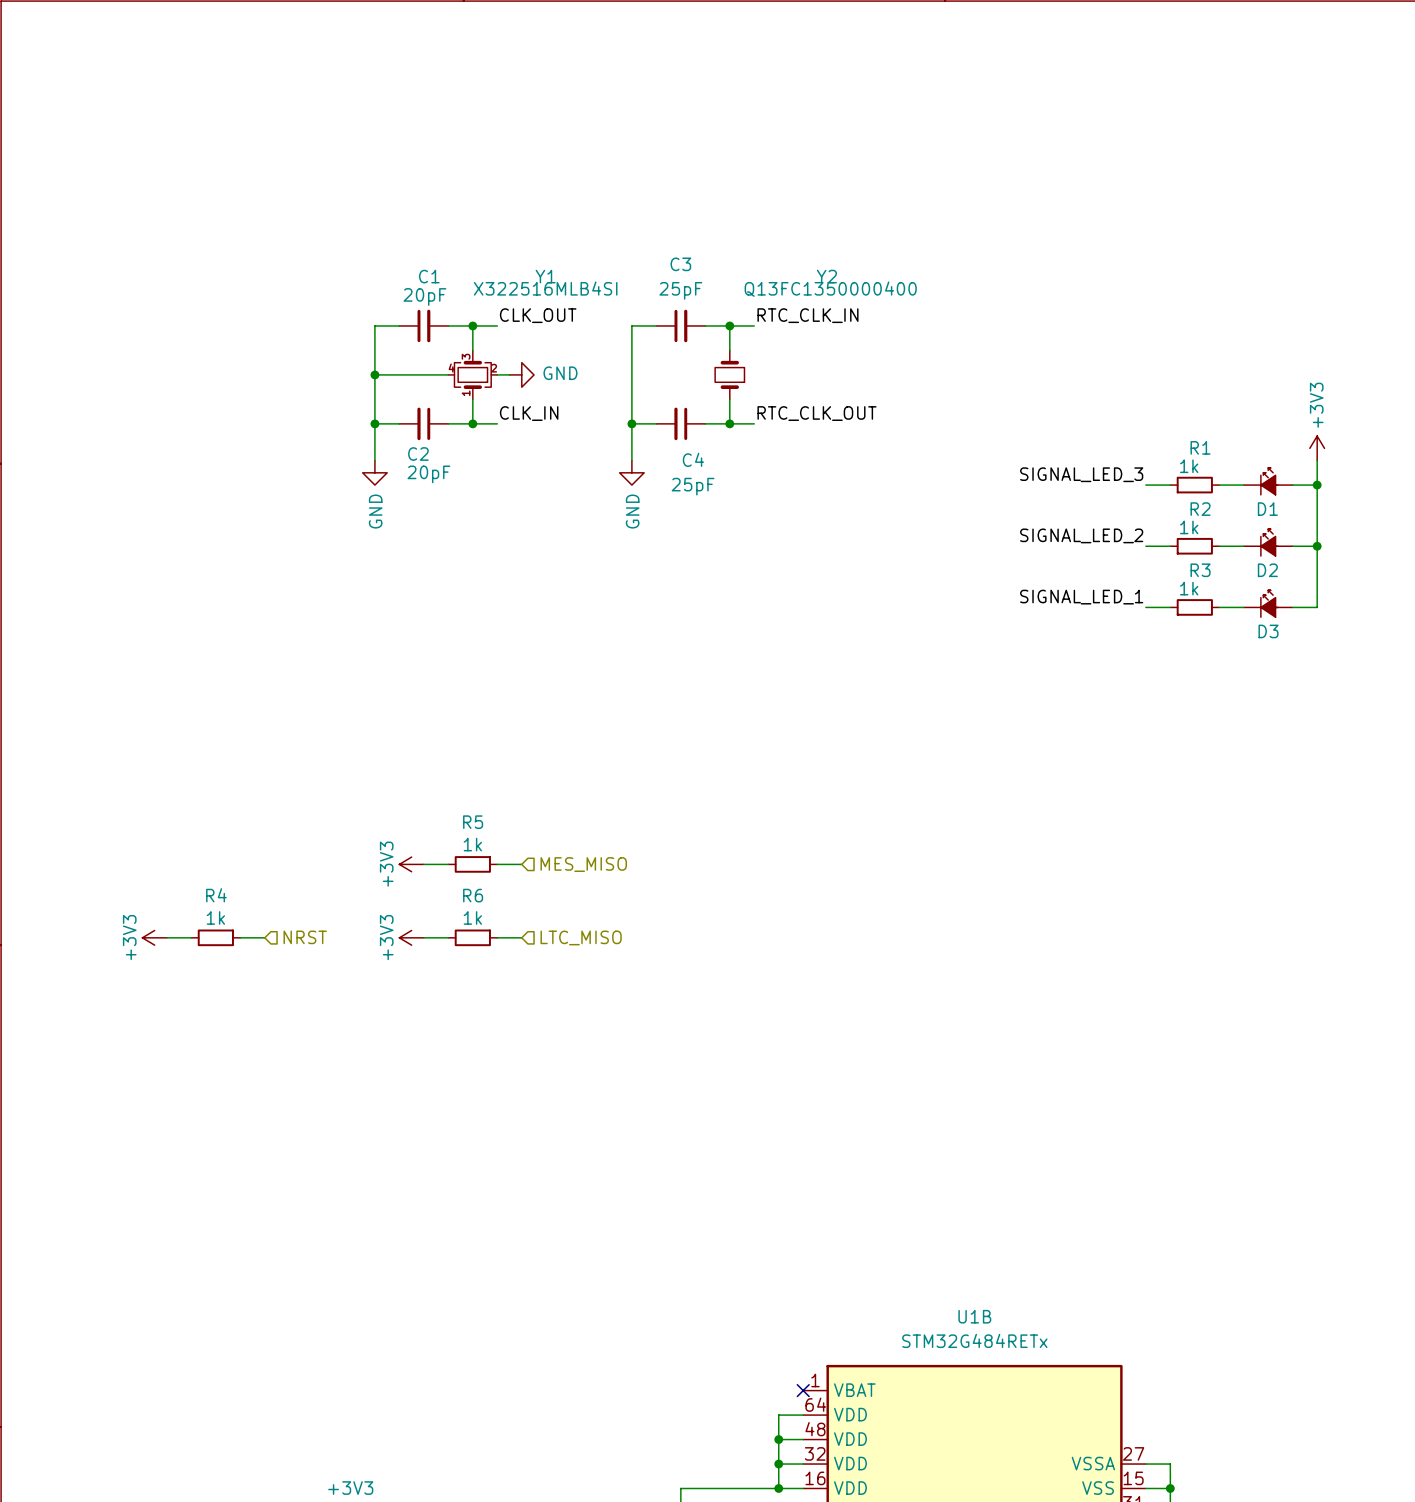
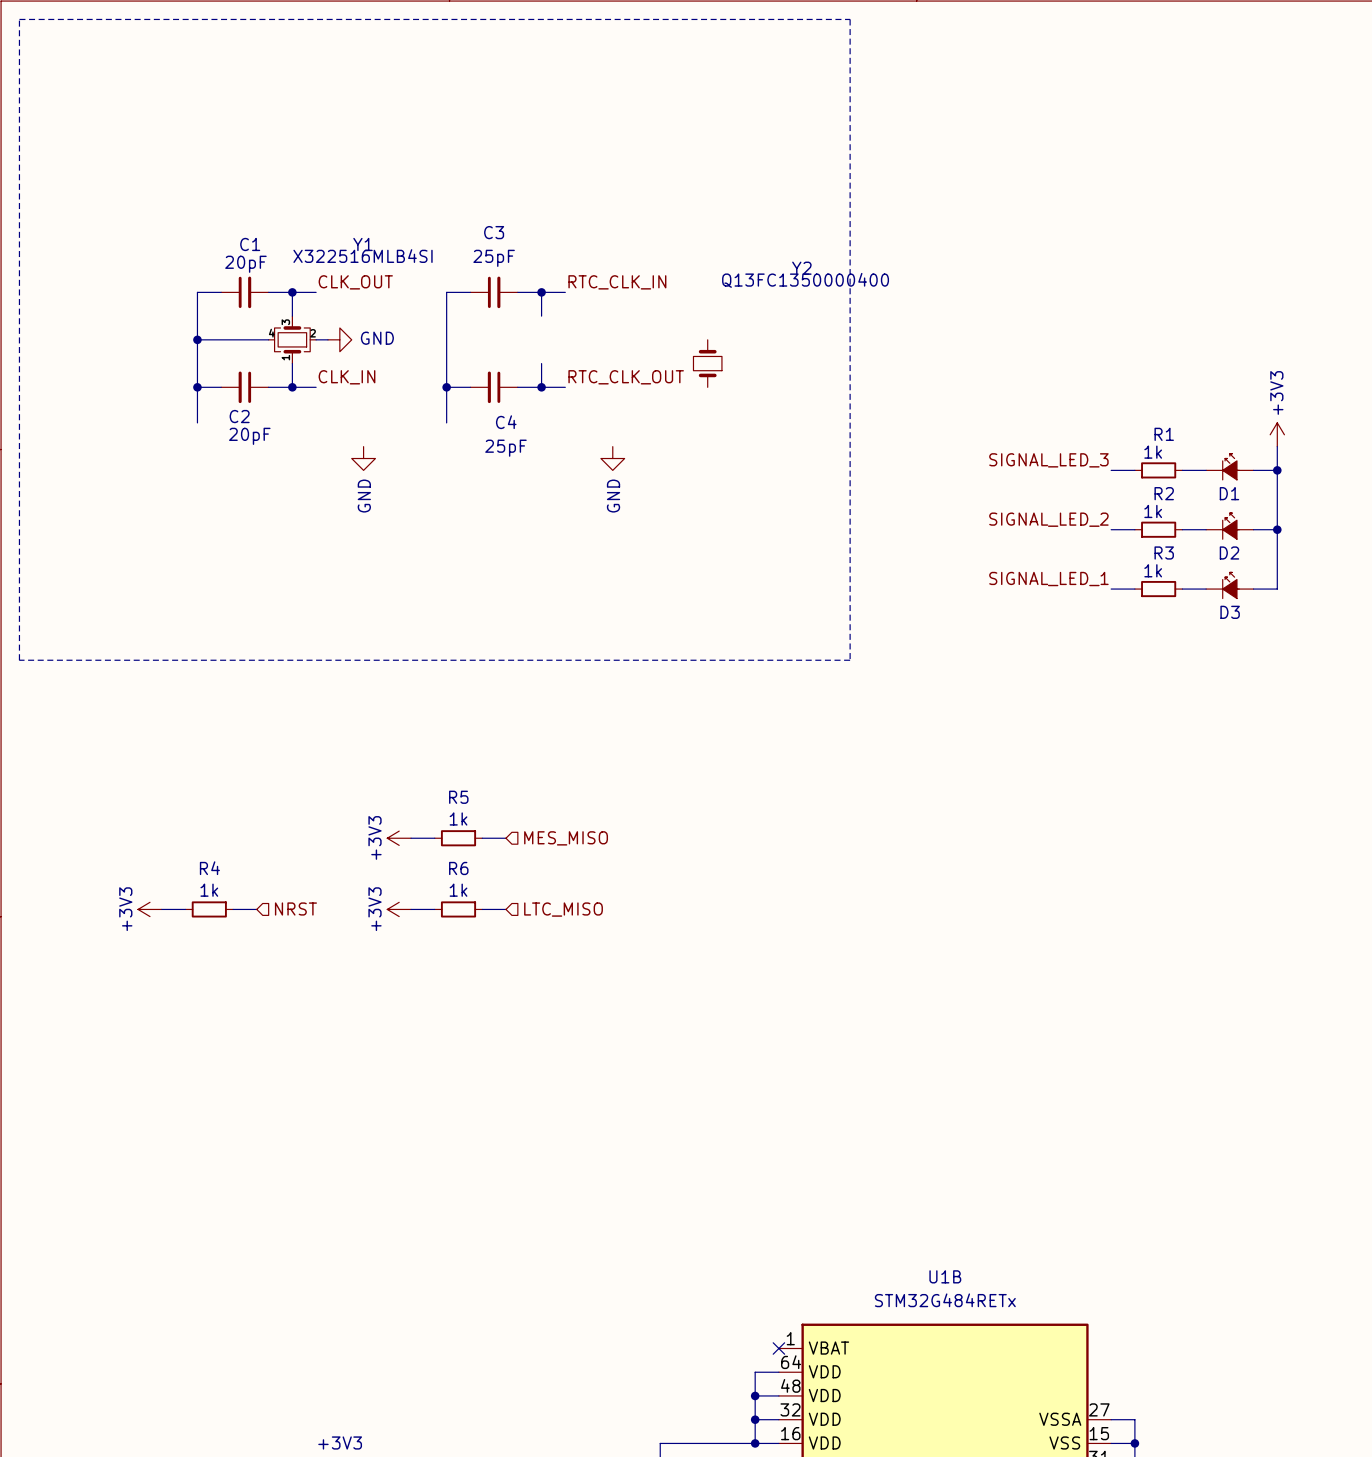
line: none -> (19, 19) (850, 19) (850, 660) (19, 660) (19, 19)
junction: none -> (292, 292)
junction: none -> (541, 292)
label position: CLK_OUT (538, 315) -> CLK_OUT (355, 282)
label position: RTC_CLK_IN (807, 315) -> RTC_CLK_IN (617, 282)
wire: (399, 325) (374, 325) (374, 460) -> (221, 292) (197, 292) (197, 422)
C1 position: (423, 325) -> (244, 292)
wire: (448, 325) (497, 325) -> (268, 292) (316, 292)
wire: (472, 325) (472, 350) -> (292, 292) (292, 316)
junction: (472, 325) -> none
wire: (656, 325) (631, 325) (631, 460) -> (470, 292) (446, 292) (446, 422)
C3 position: (680, 325) -> (494, 292)
wire: (705, 325) (754, 325) -> (517, 292) (565, 292)
wire: (729, 325) (729, 350) -> (541, 292) (541, 316)
junction: (729, 325) -> none
junction: none -> (197, 339)
wire: (374, 374) (448, 374) -> (197, 339) (268, 339)
junction: (374, 374) -> none
Y1 position: (472, 374) -> (292, 339)
wire: (497, 374) (509, 374) -> (316, 339) (327, 339)
power symbol position: GND (521, 374) -> GND (339, 339)
junction: none -> (197, 387)
junction: none -> (292, 387)
wire: (472, 399) (472, 423) -> (292, 363) (292, 387)
junction: none -> (541, 387)
wire: (729, 399) (729, 423) -> (541, 363) (541, 387)
label position: CLK_IN (529, 413) -> CLK_IN (347, 377)
label position: RTC_CLK_OUT (817, 413) -> RTC_CLK_OUT (626, 377)
wire: (374, 423) (399, 423) -> (197, 387) (221, 387)
junction: (374, 423) -> none
C2 position: (423, 423) -> (244, 387)
wire: (448, 423) (497, 423) -> (268, 387) (316, 387)
junction position: (472, 423) -> (446, 387)
wire: (631, 423) (656, 423) -> (446, 387) (470, 387)
junction: (631, 423) -> none
C4 position: (680, 423) -> (494, 387)
wire: (705, 423) (754, 423) -> (517, 387) (565, 387)
junction: (729, 423) -> none

